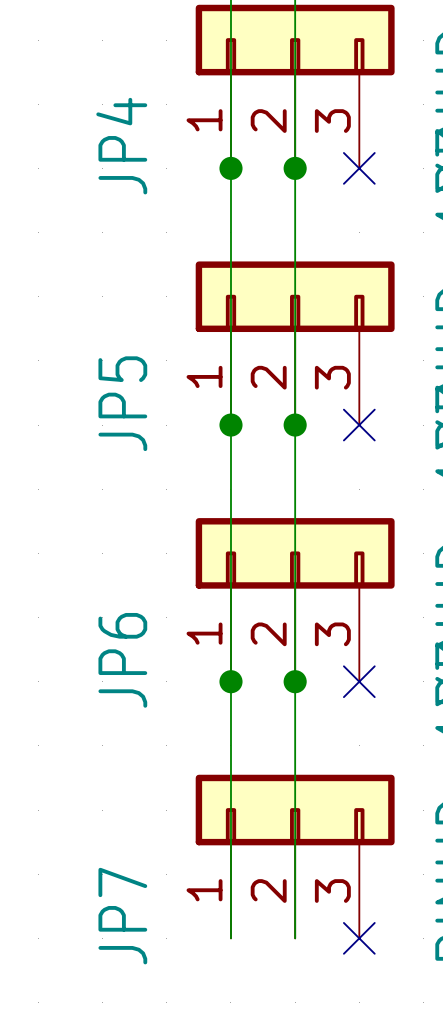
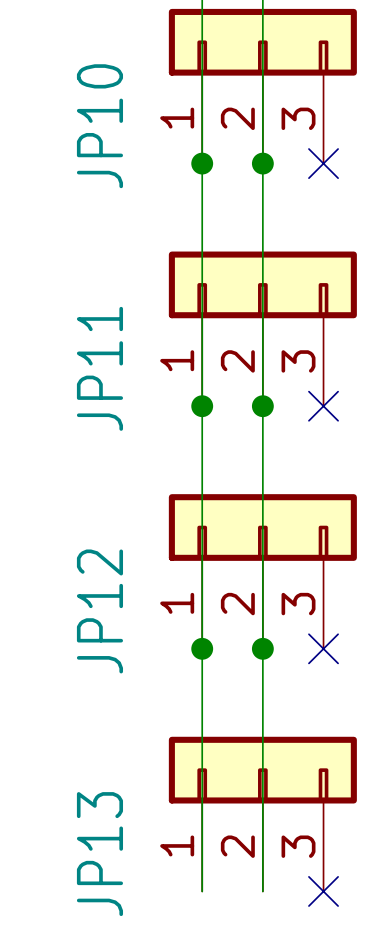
JP4 name: JP4 (121, 146) -> JP10 (99, 126)
JP5 name: JP5 (122, 403) -> JP11 (99, 368)
JP6 name: JP6 (122, 660) -> JP12 (99, 611)
JP7 name: JP7 (122, 916) -> JP13 (99, 854)

